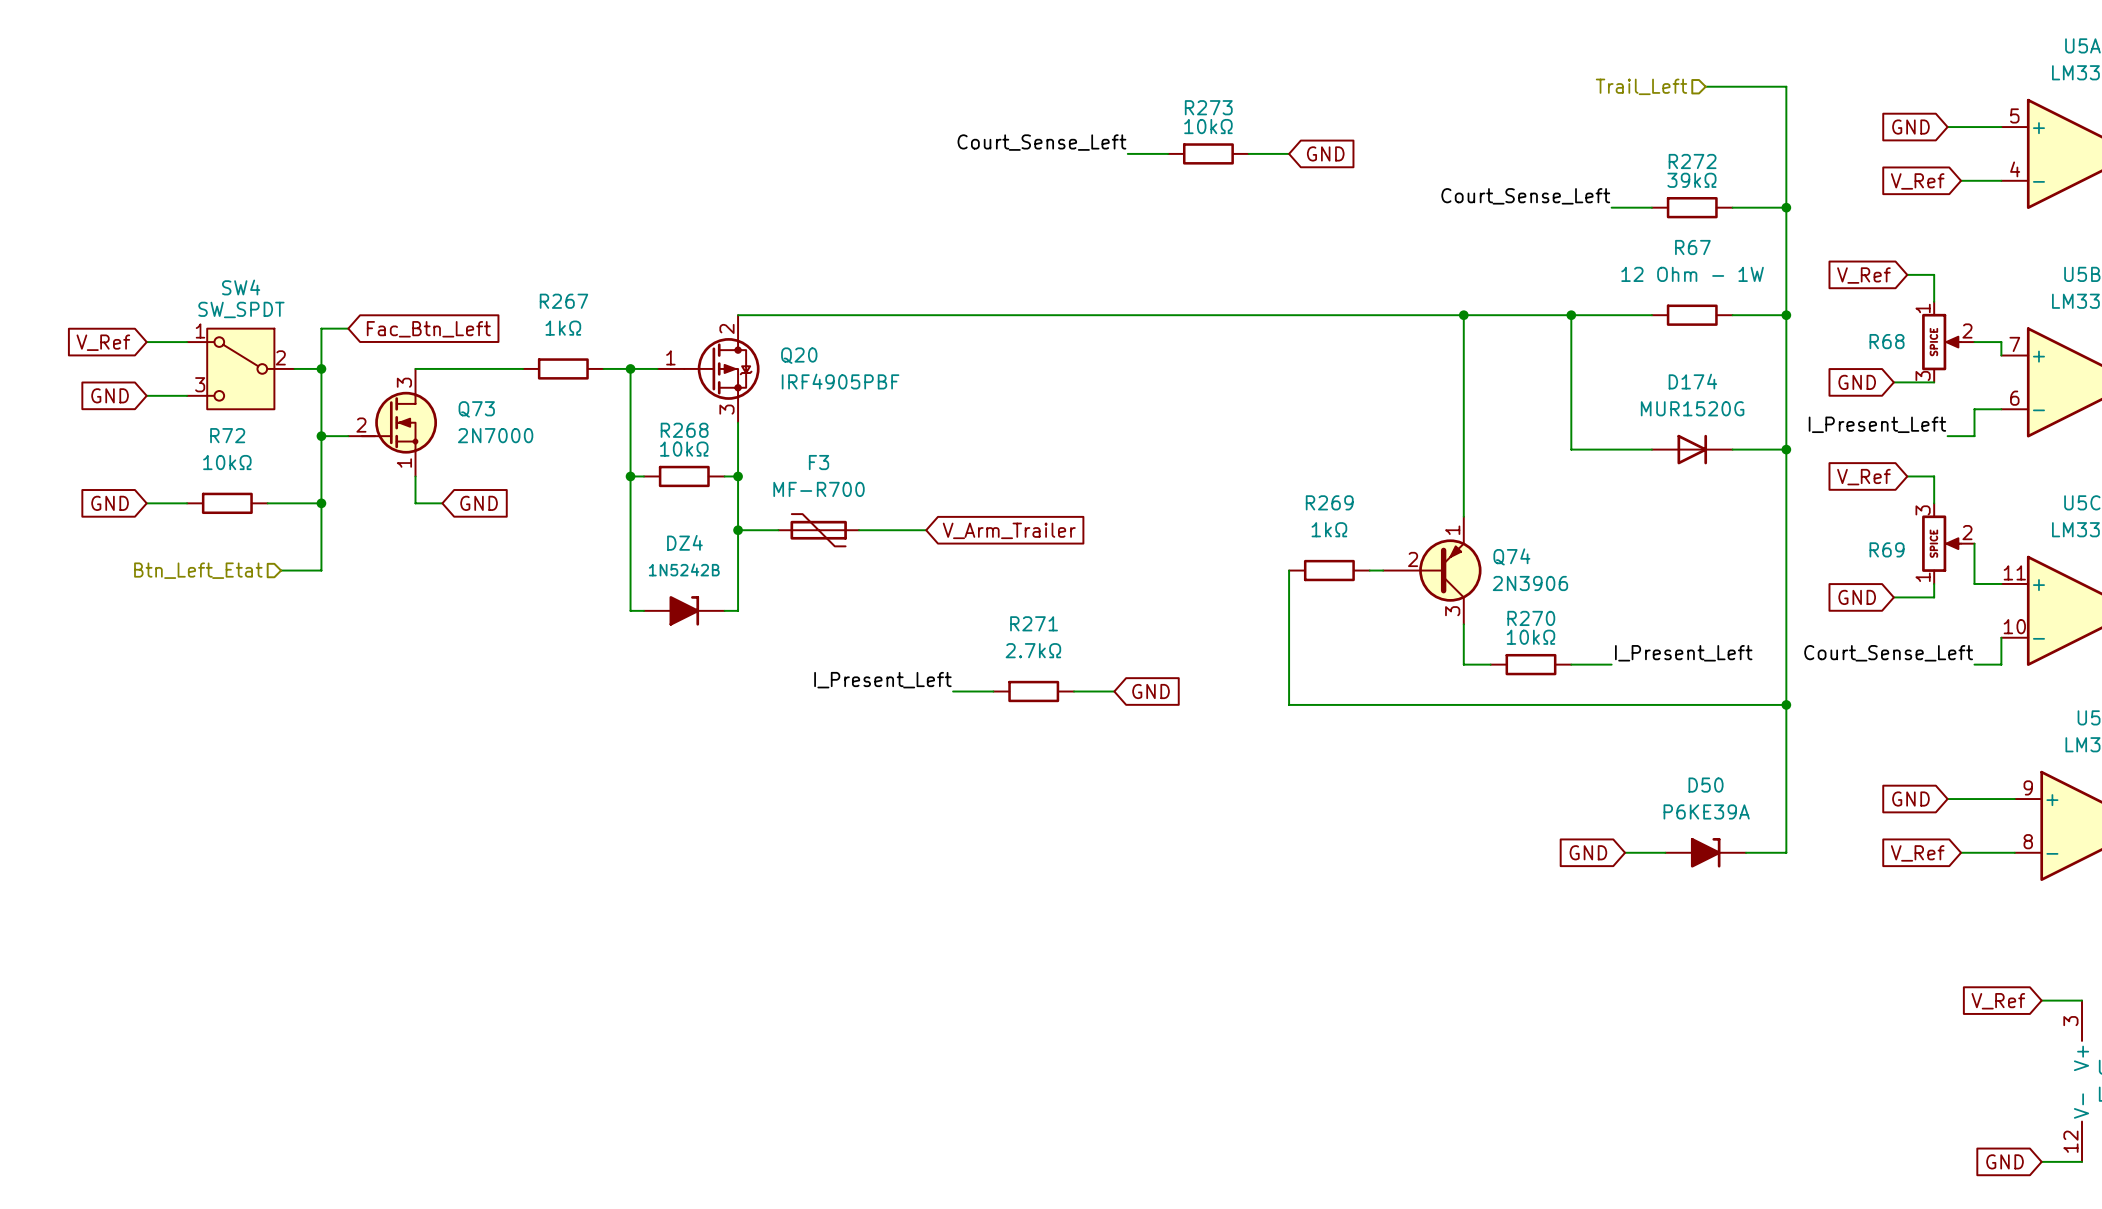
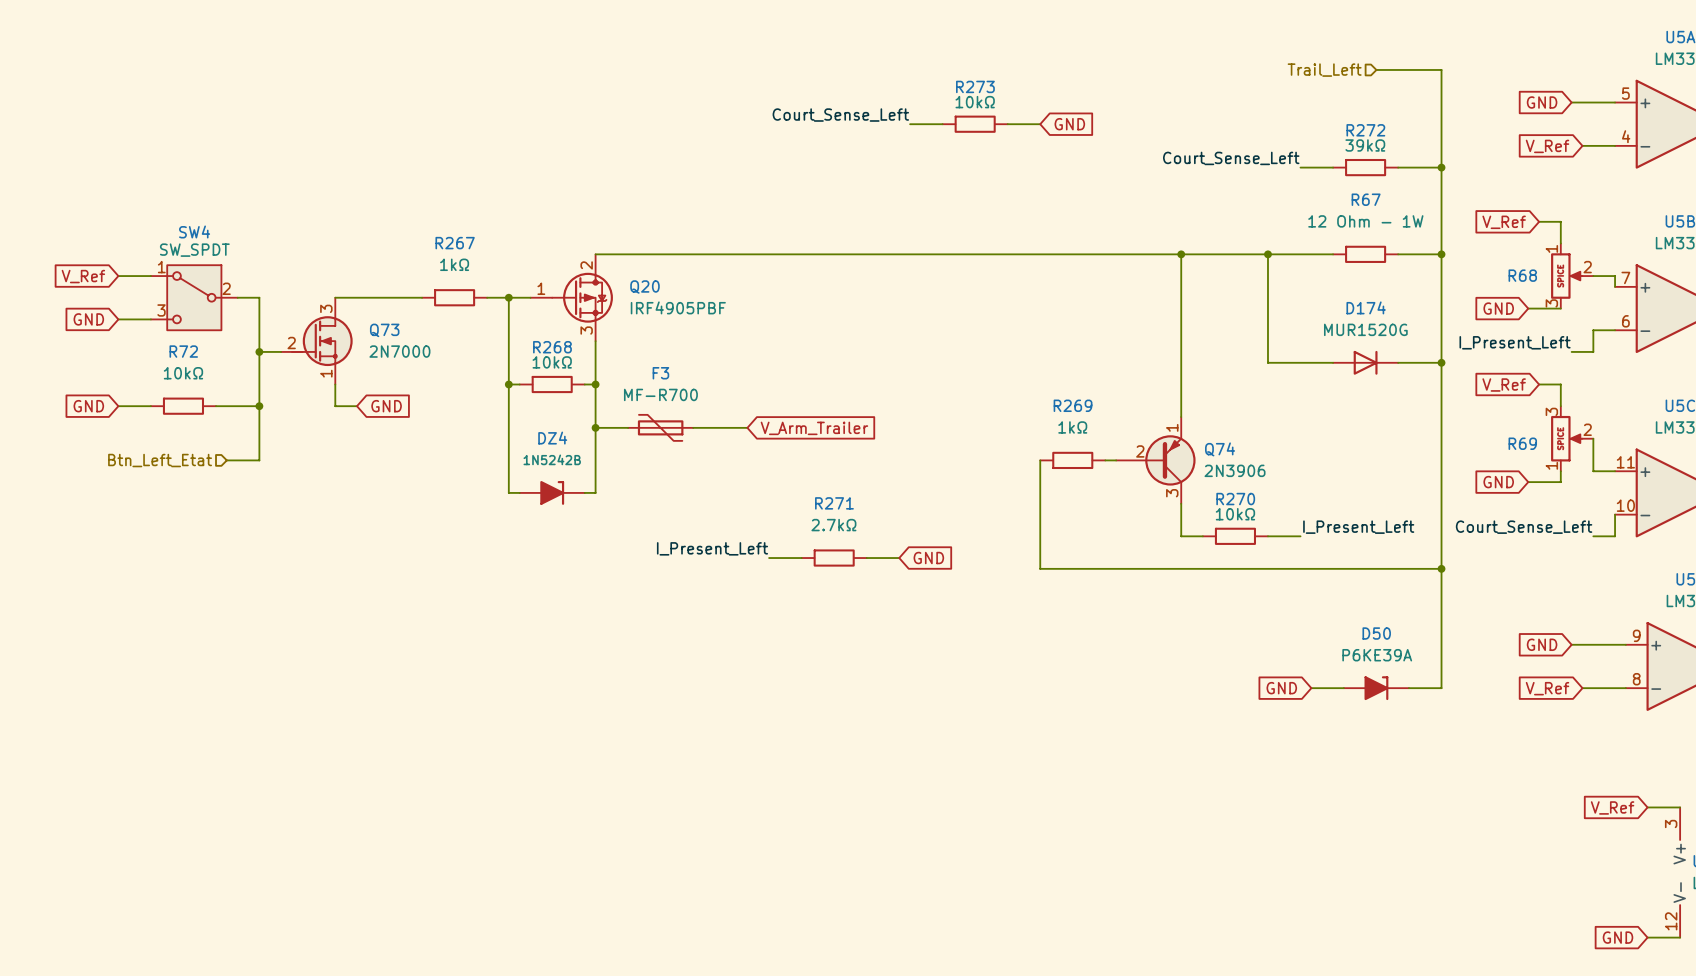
wire: (348, 328) (321, 328) (321, 368) -> none
global label: Fac_Btn_Left (428, 329) -> none
junction: (321, 368) -> none

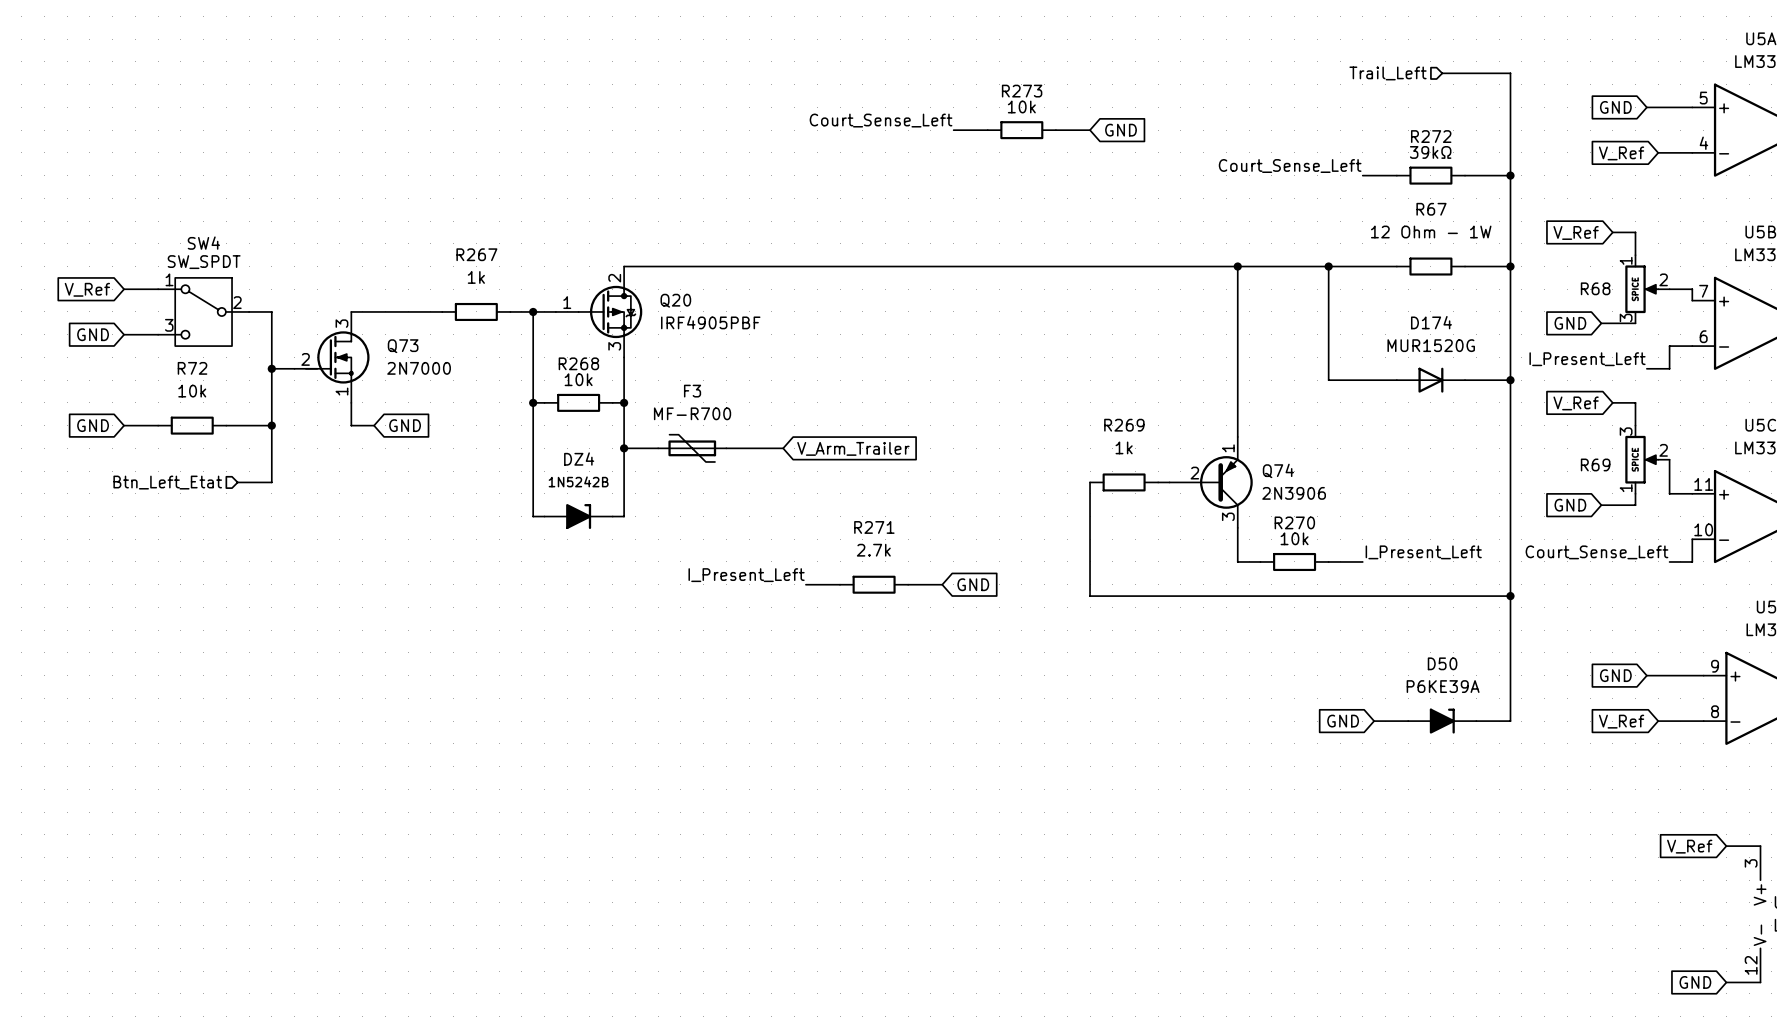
R273 value: 10kΩ (975, 102) -> 10k (1021, 107)
R267 value: 1kΩ (454, 264) -> 1k (476, 277)
R268 value: 10kΩ (552, 362) -> 10k (578, 379)
R72 value: 10kΩ (183, 373) -> 10k (192, 391)
R269 value: 1kΩ (1072, 427) -> 1k (1124, 447)
R270 value: 10kΩ (1235, 514) -> 10k (1294, 538)
R271 value: 2.7kΩ (833, 525) -> 2.7k (873, 550)

